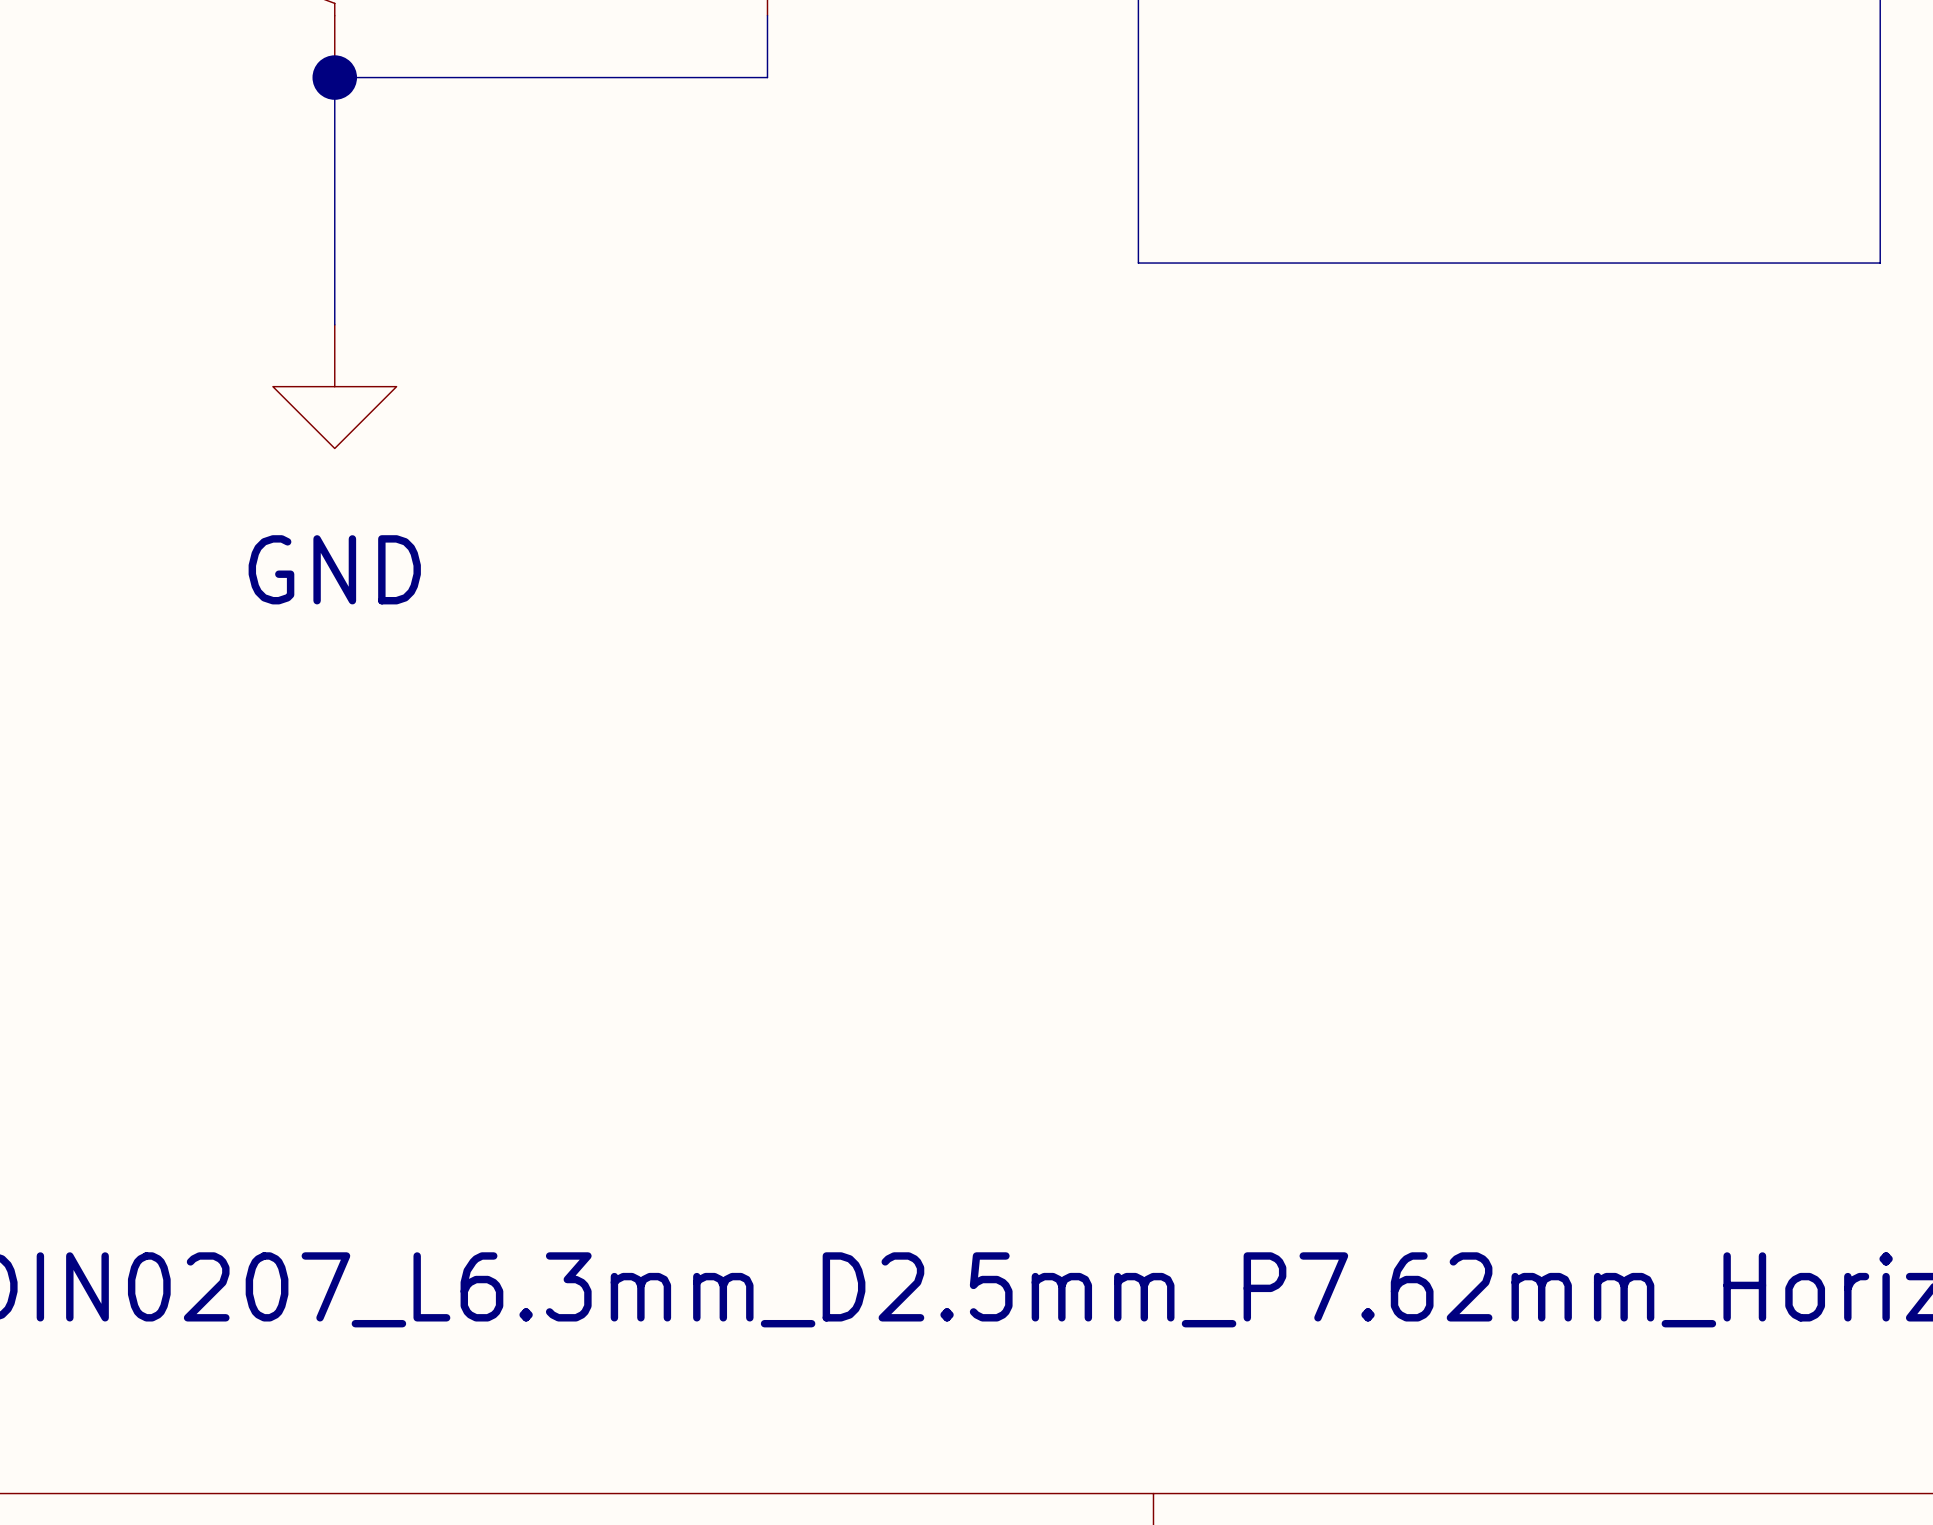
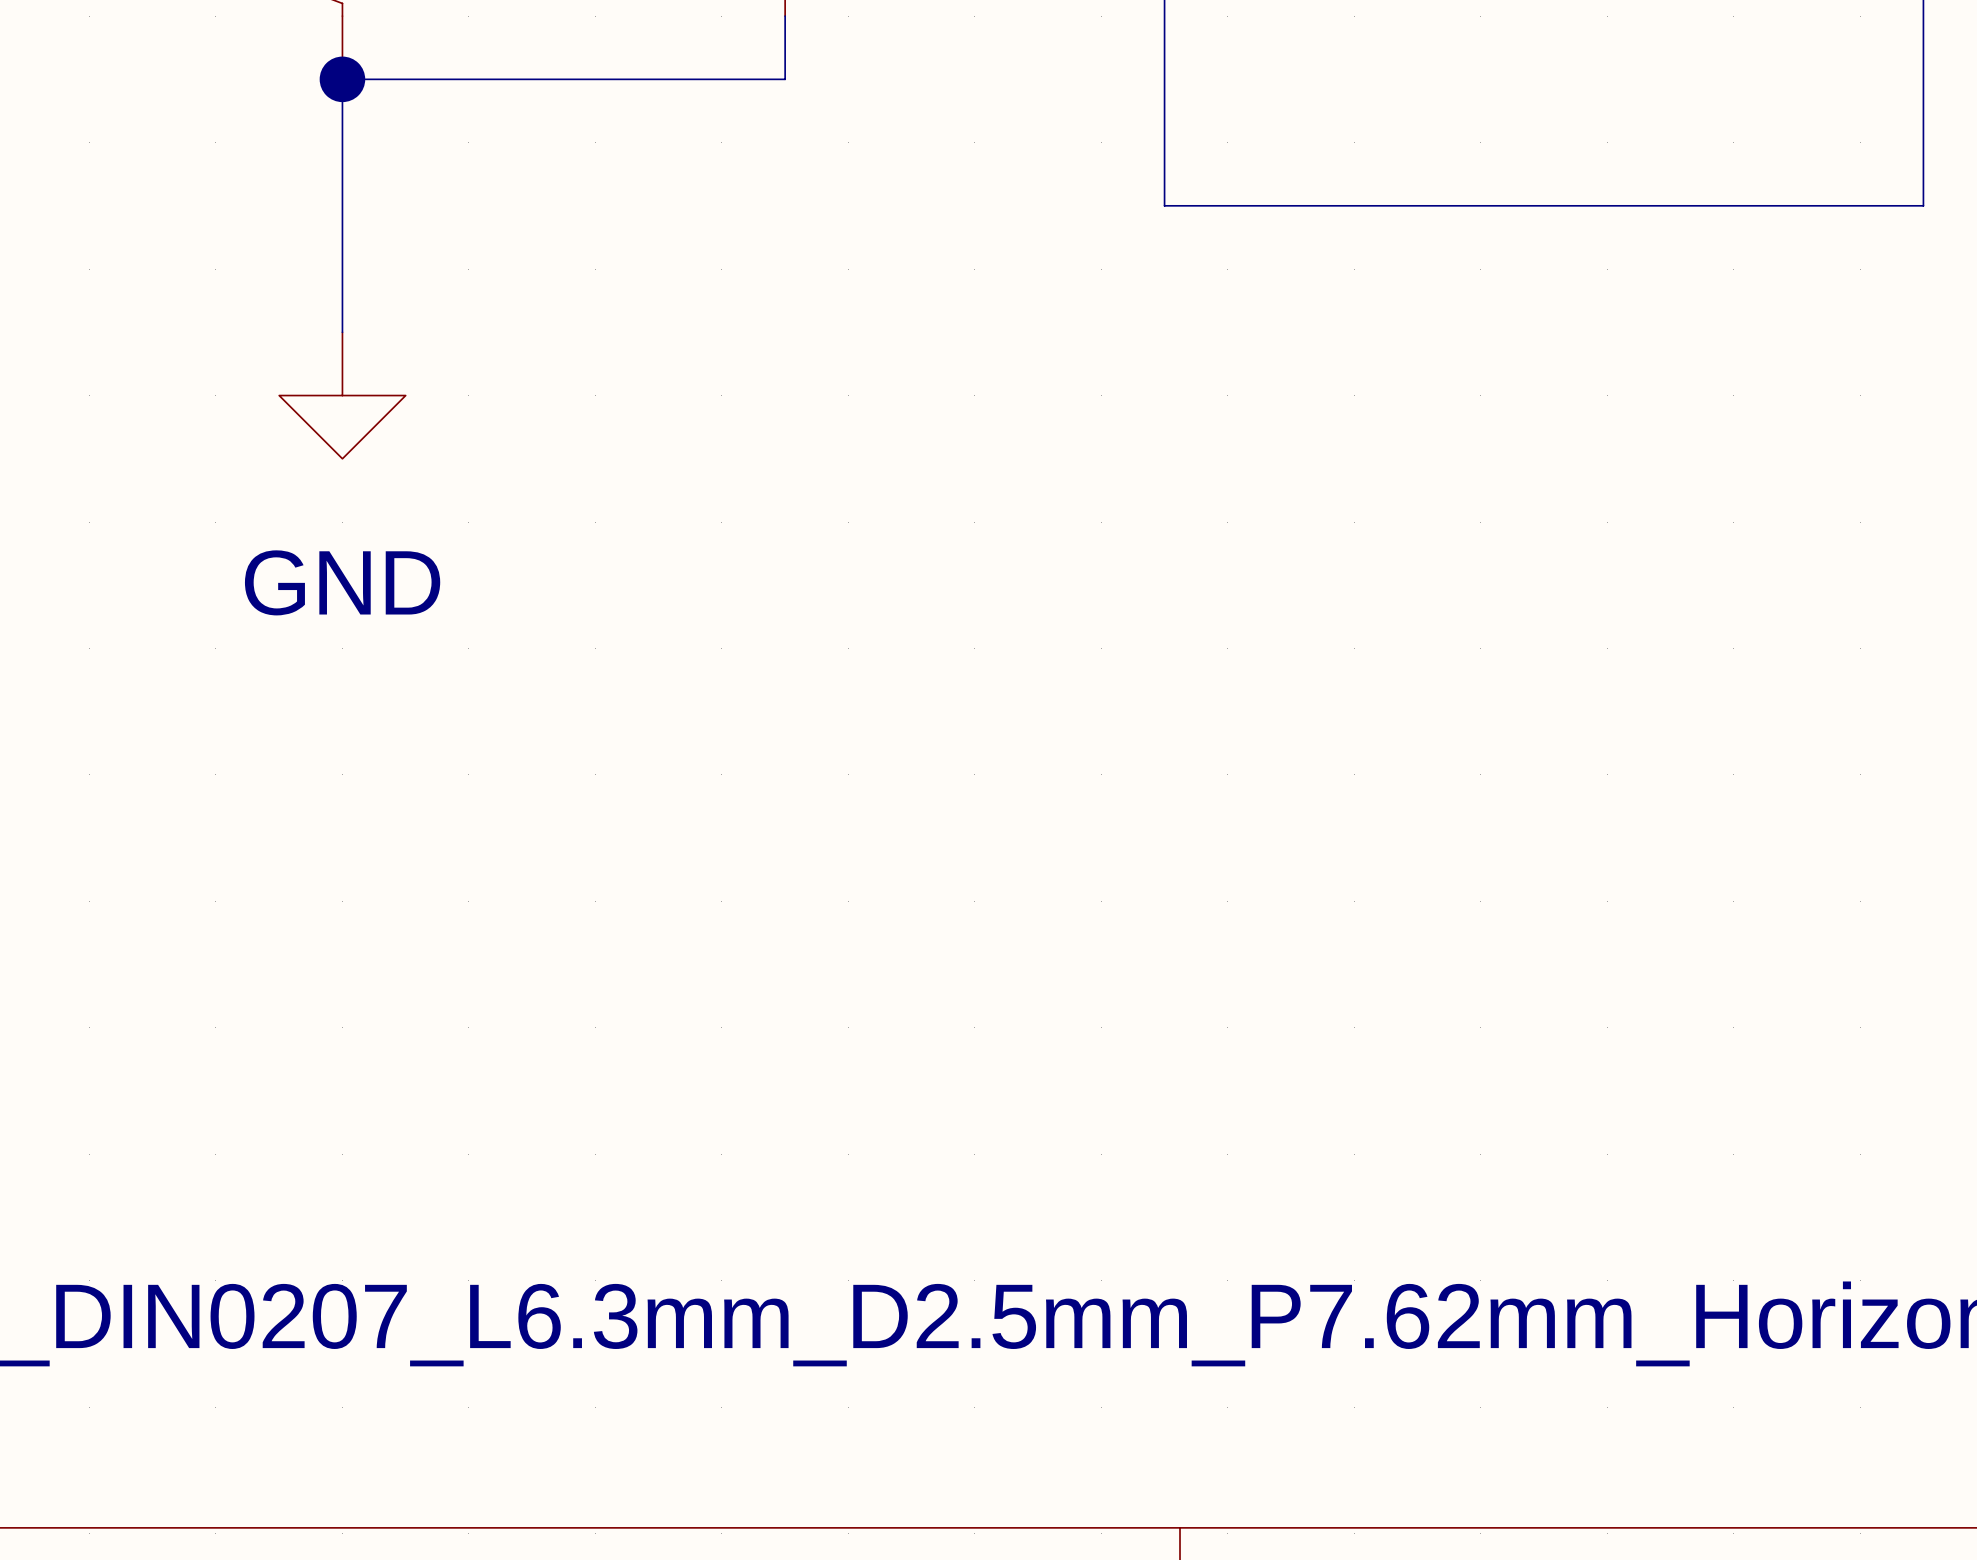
wire: (1138, 201) (1138, 263) (1880, 263) (1880, 201) -> (1164, 205) (1923, 205)

